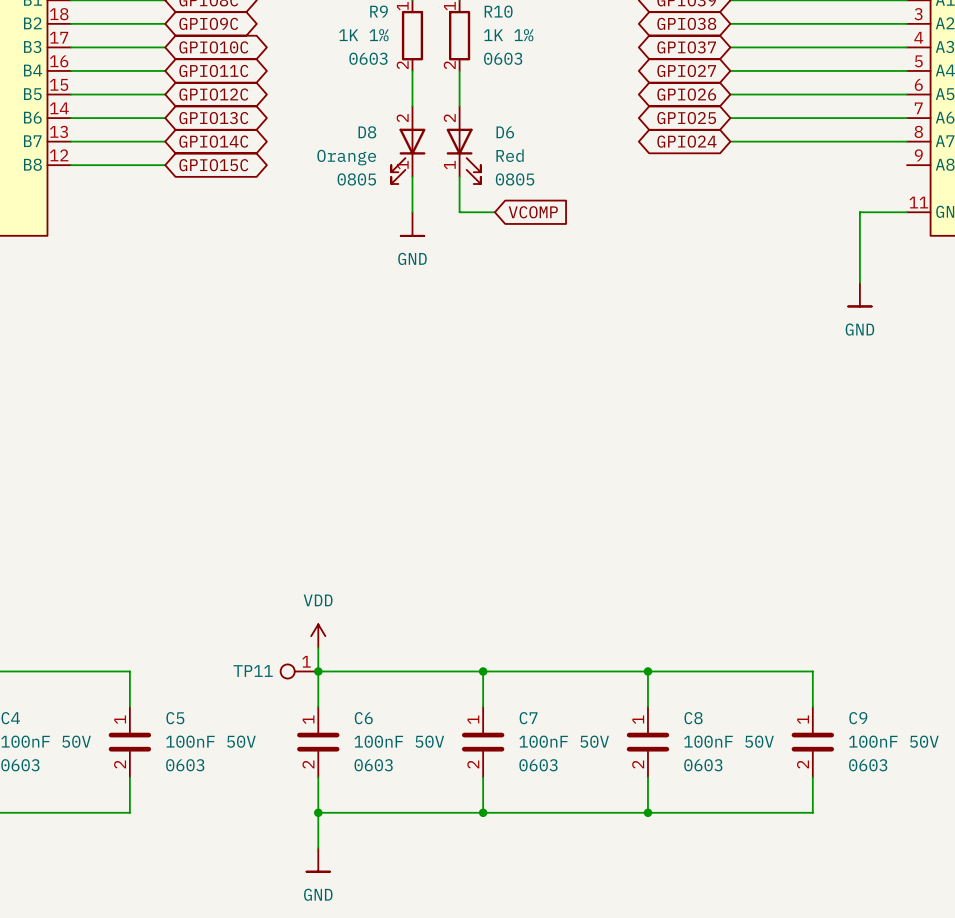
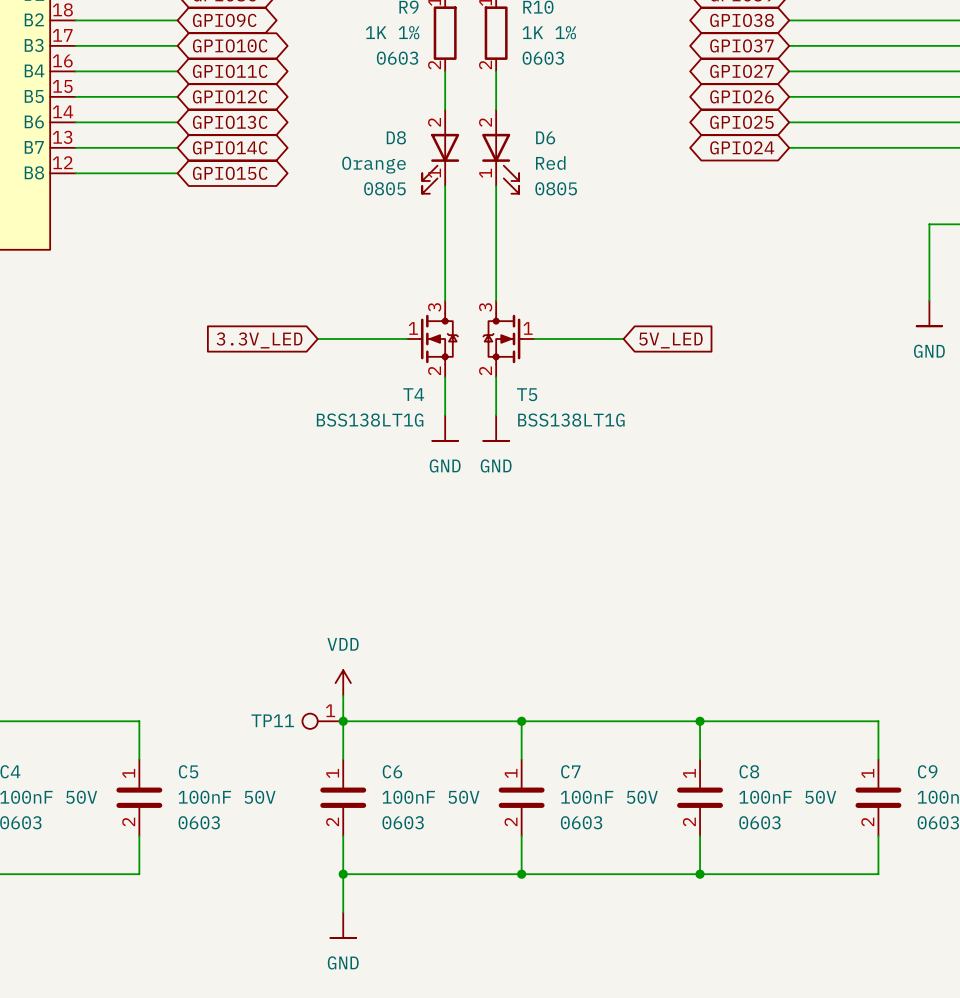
wire: none -> (445, 224) (445, 300)
wire: (459, 212) (494, 212) -> (496, 224) (496, 300)
global label: VCOMP (533, 212) -> none
power symbol: GND (412, 224) -> none
wire: none -> (317, 339) (406, 339)
T4: none -> BSS138LT1G (432, 339)
T5: none -> BSS138LT1G (508, 339)
wire: none -> (534, 339) (623, 339)
global label: none -> 3.3V_LED (259, 340)
global label: none -> 5V_LED (670, 340)
wire: none -> (445, 377) (445, 415)
wire: none -> (496, 377) (496, 415)
power symbol: none -> GND (445, 428)
power symbol: none -> GND (496, 428)

